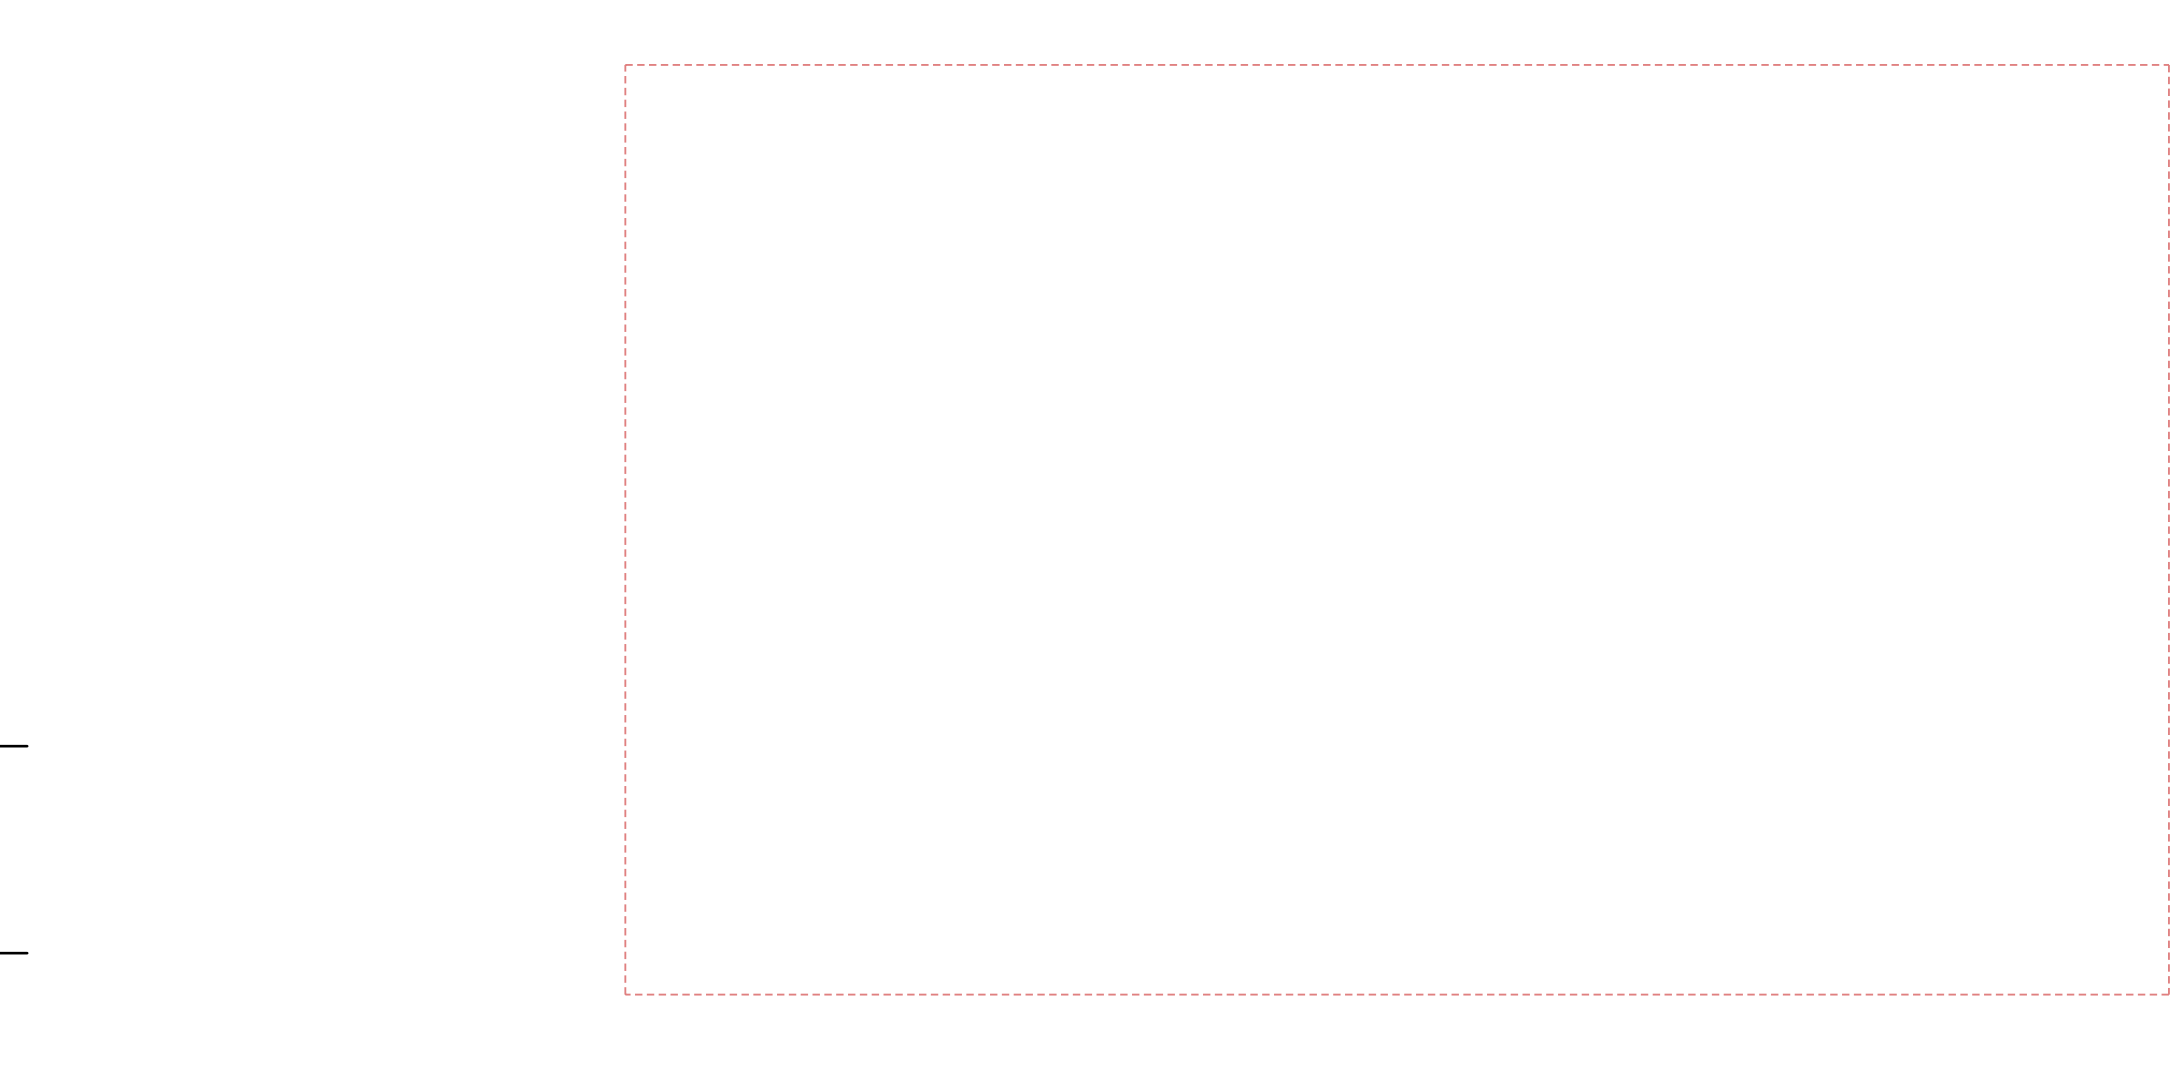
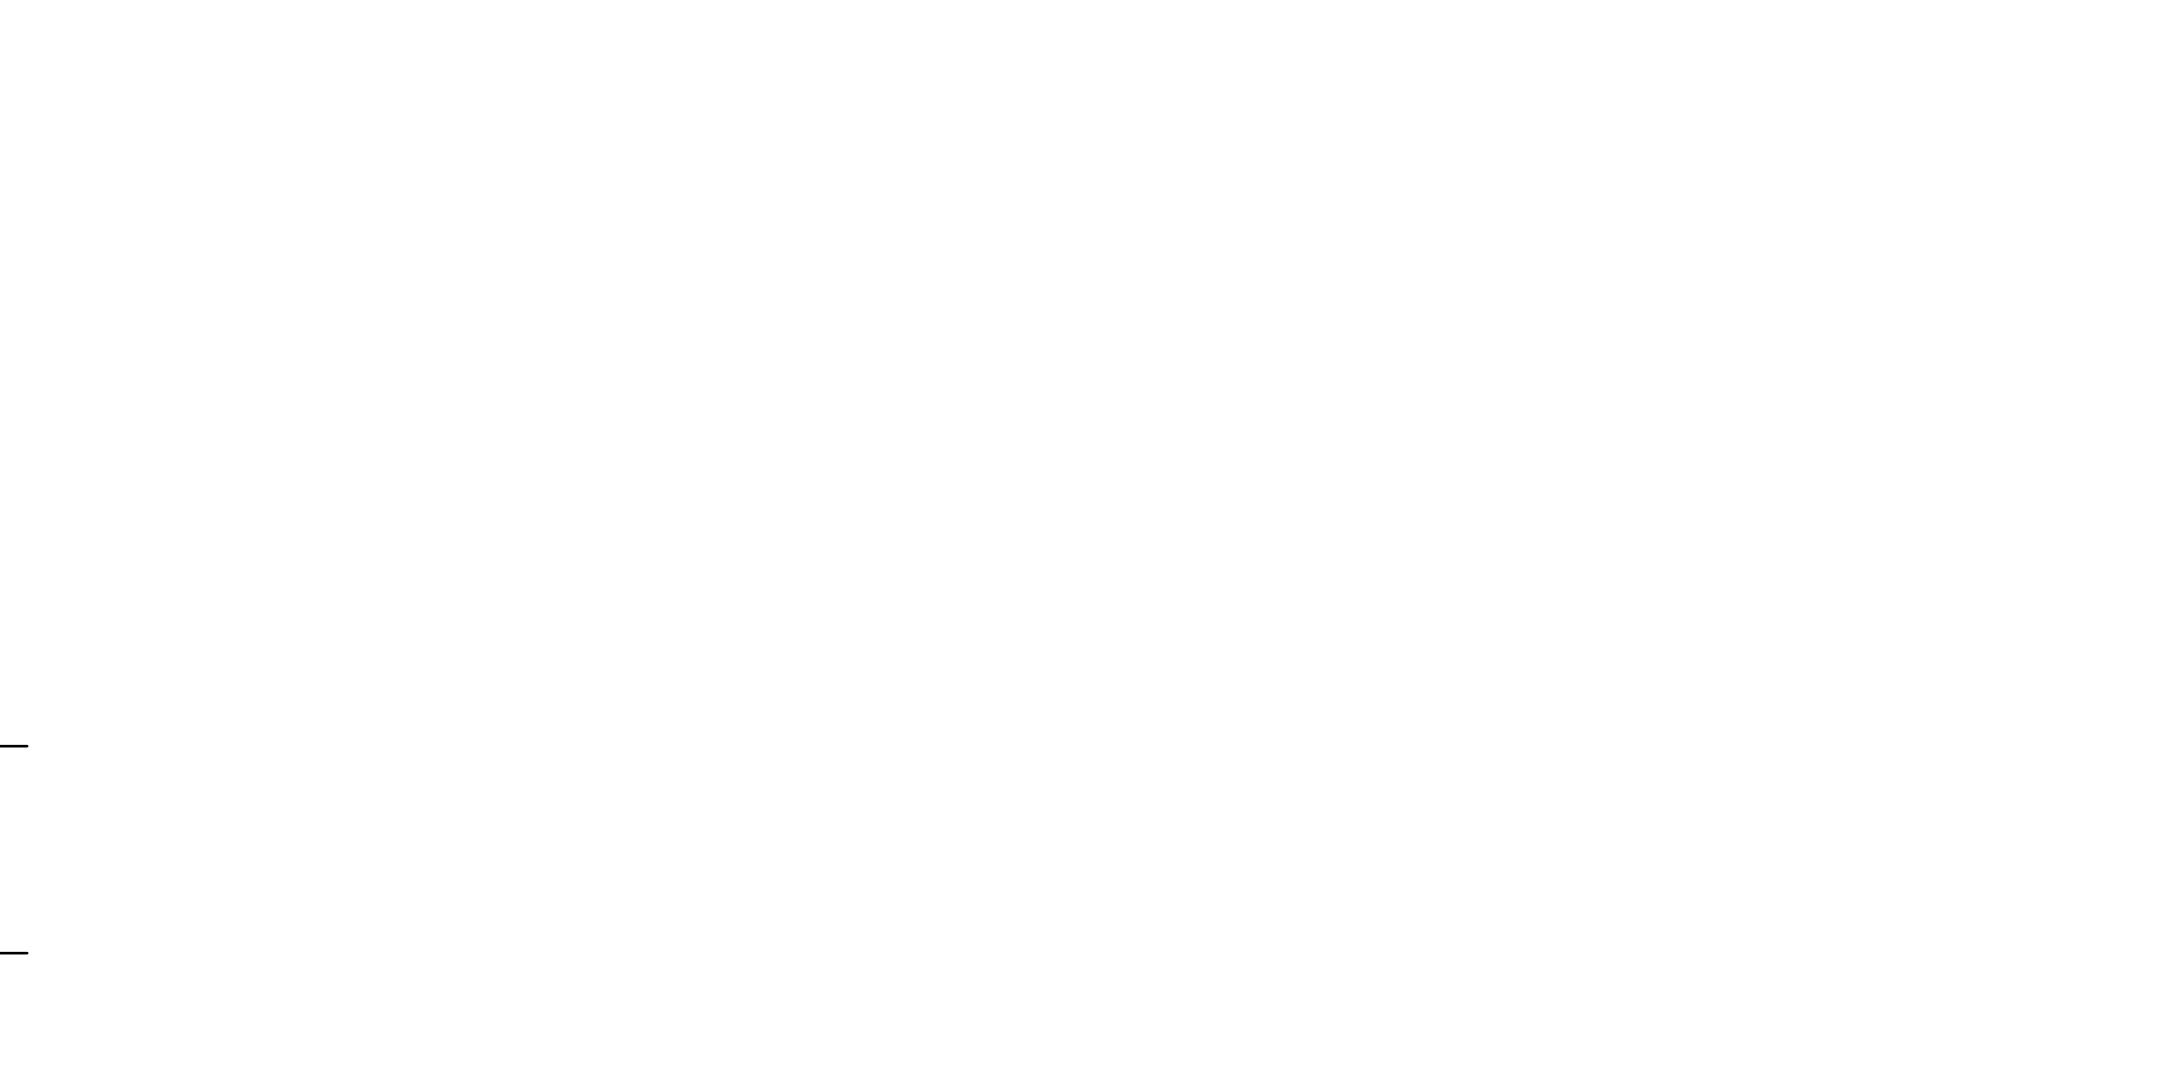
zone outline: (625, 64) (625, 994) (2168, 994) (2168, 64) (625, 64) -> none

